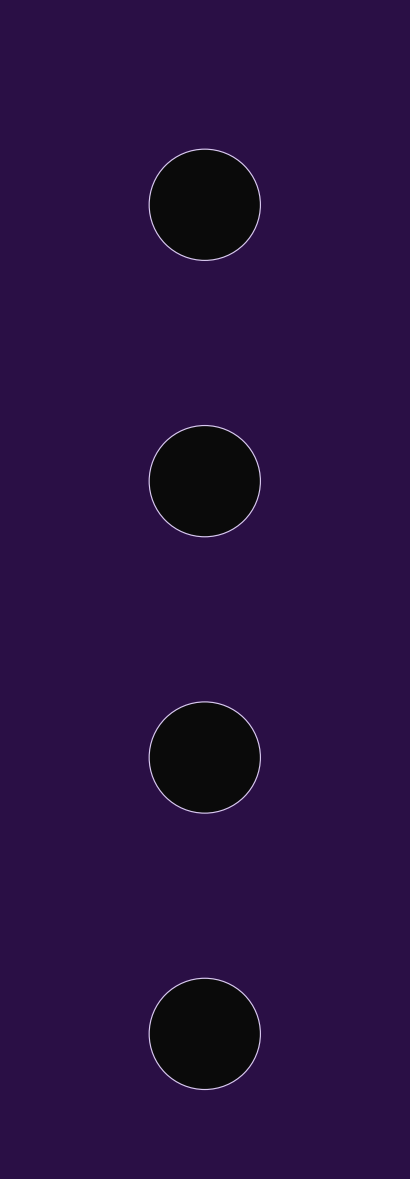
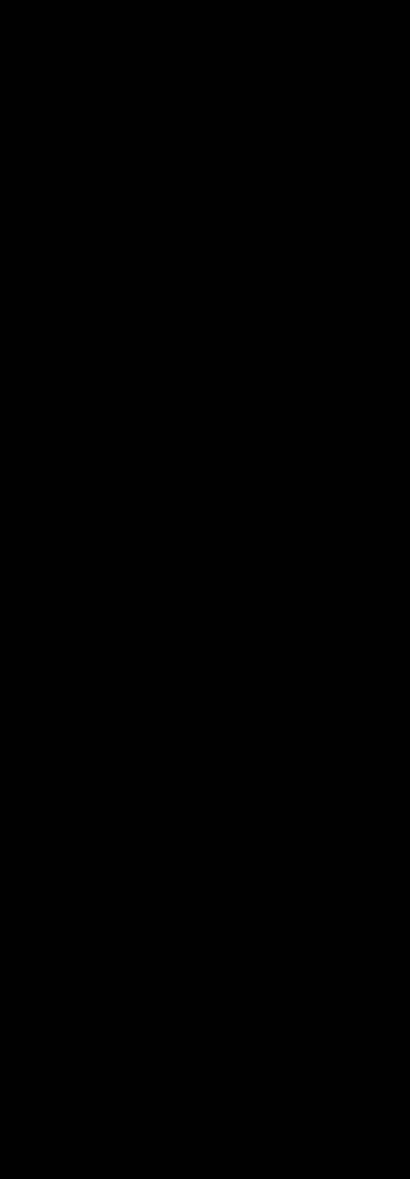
part: (204, 204) -> none
part: (204, 481) -> none
part: (204, 757) -> none
part: (204, 1033) -> none

